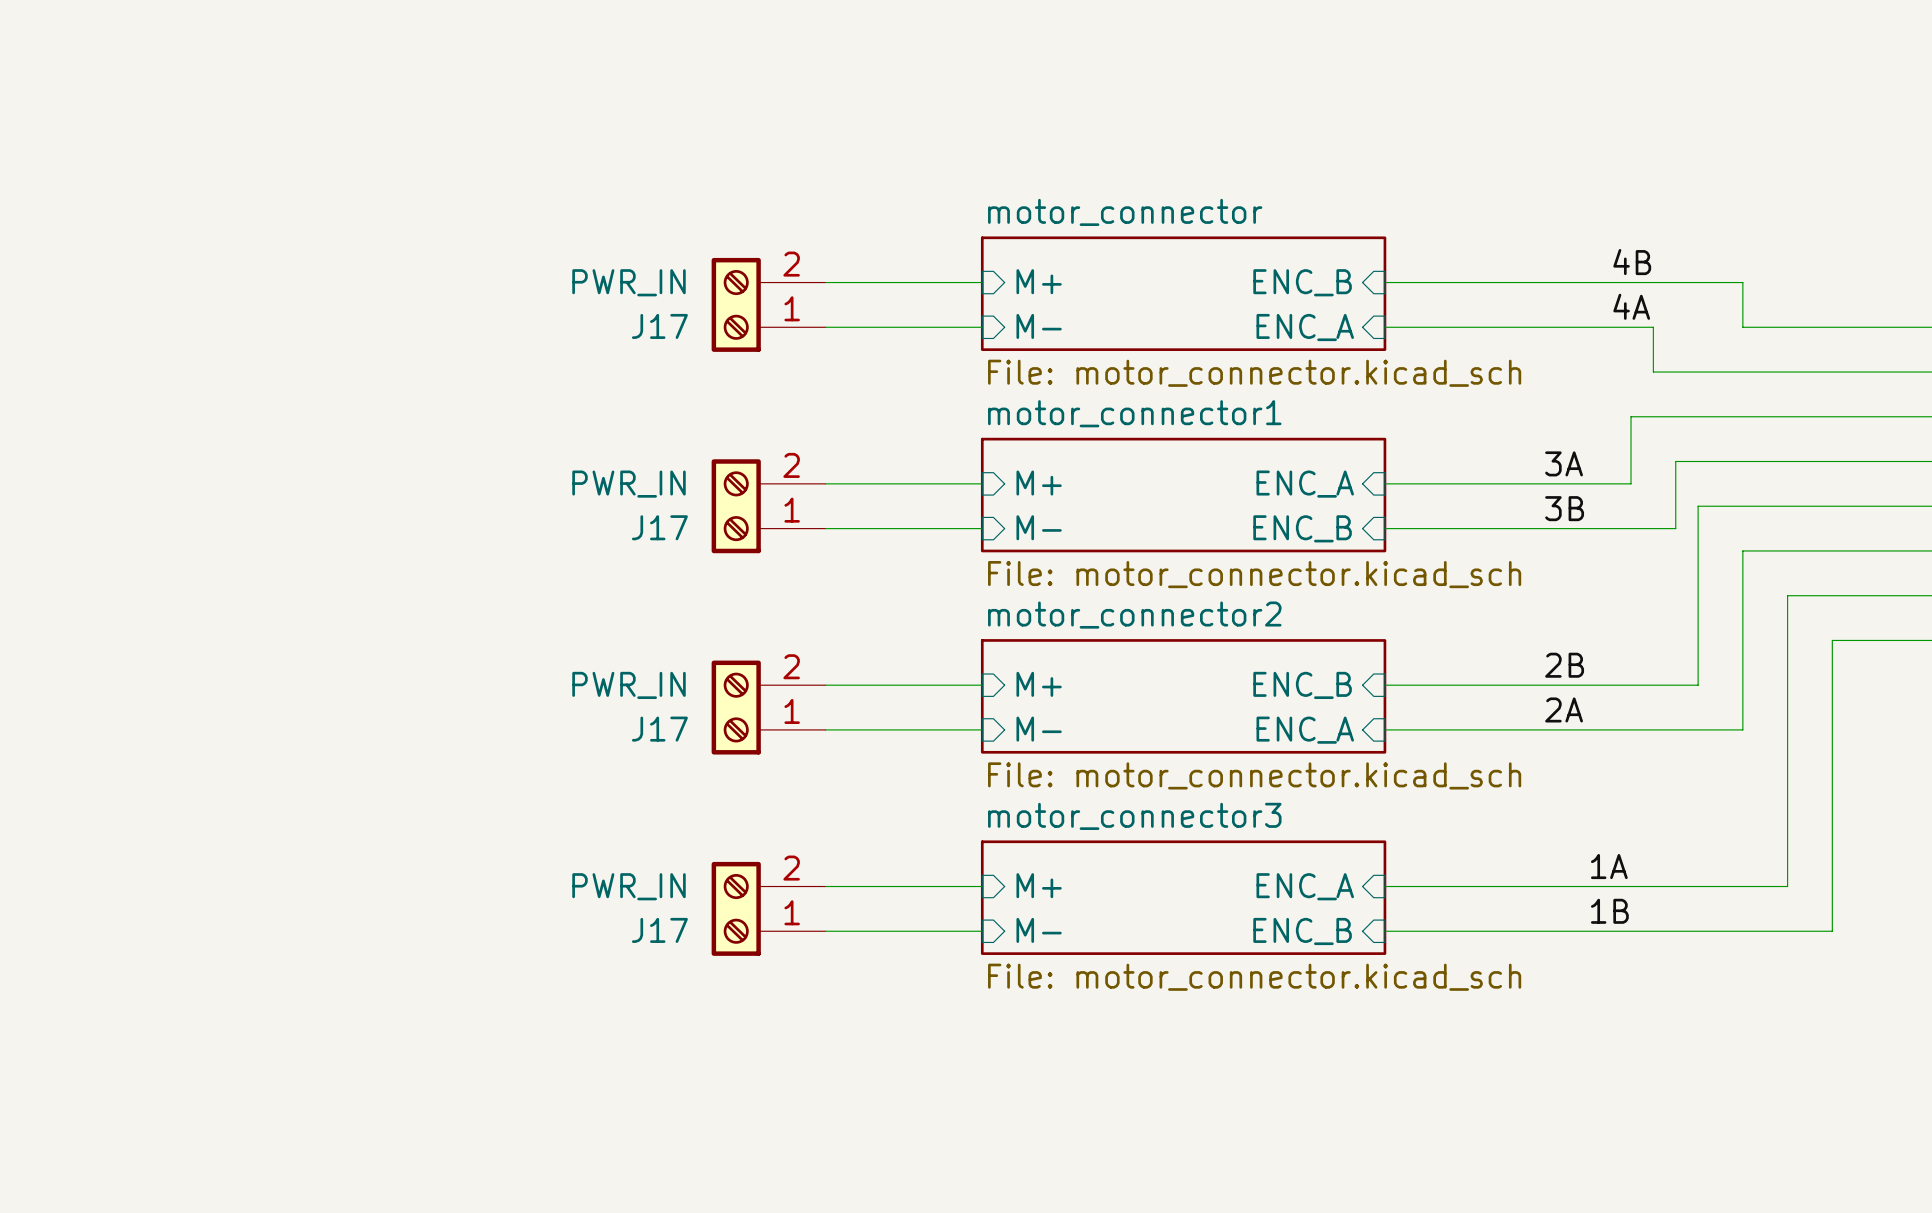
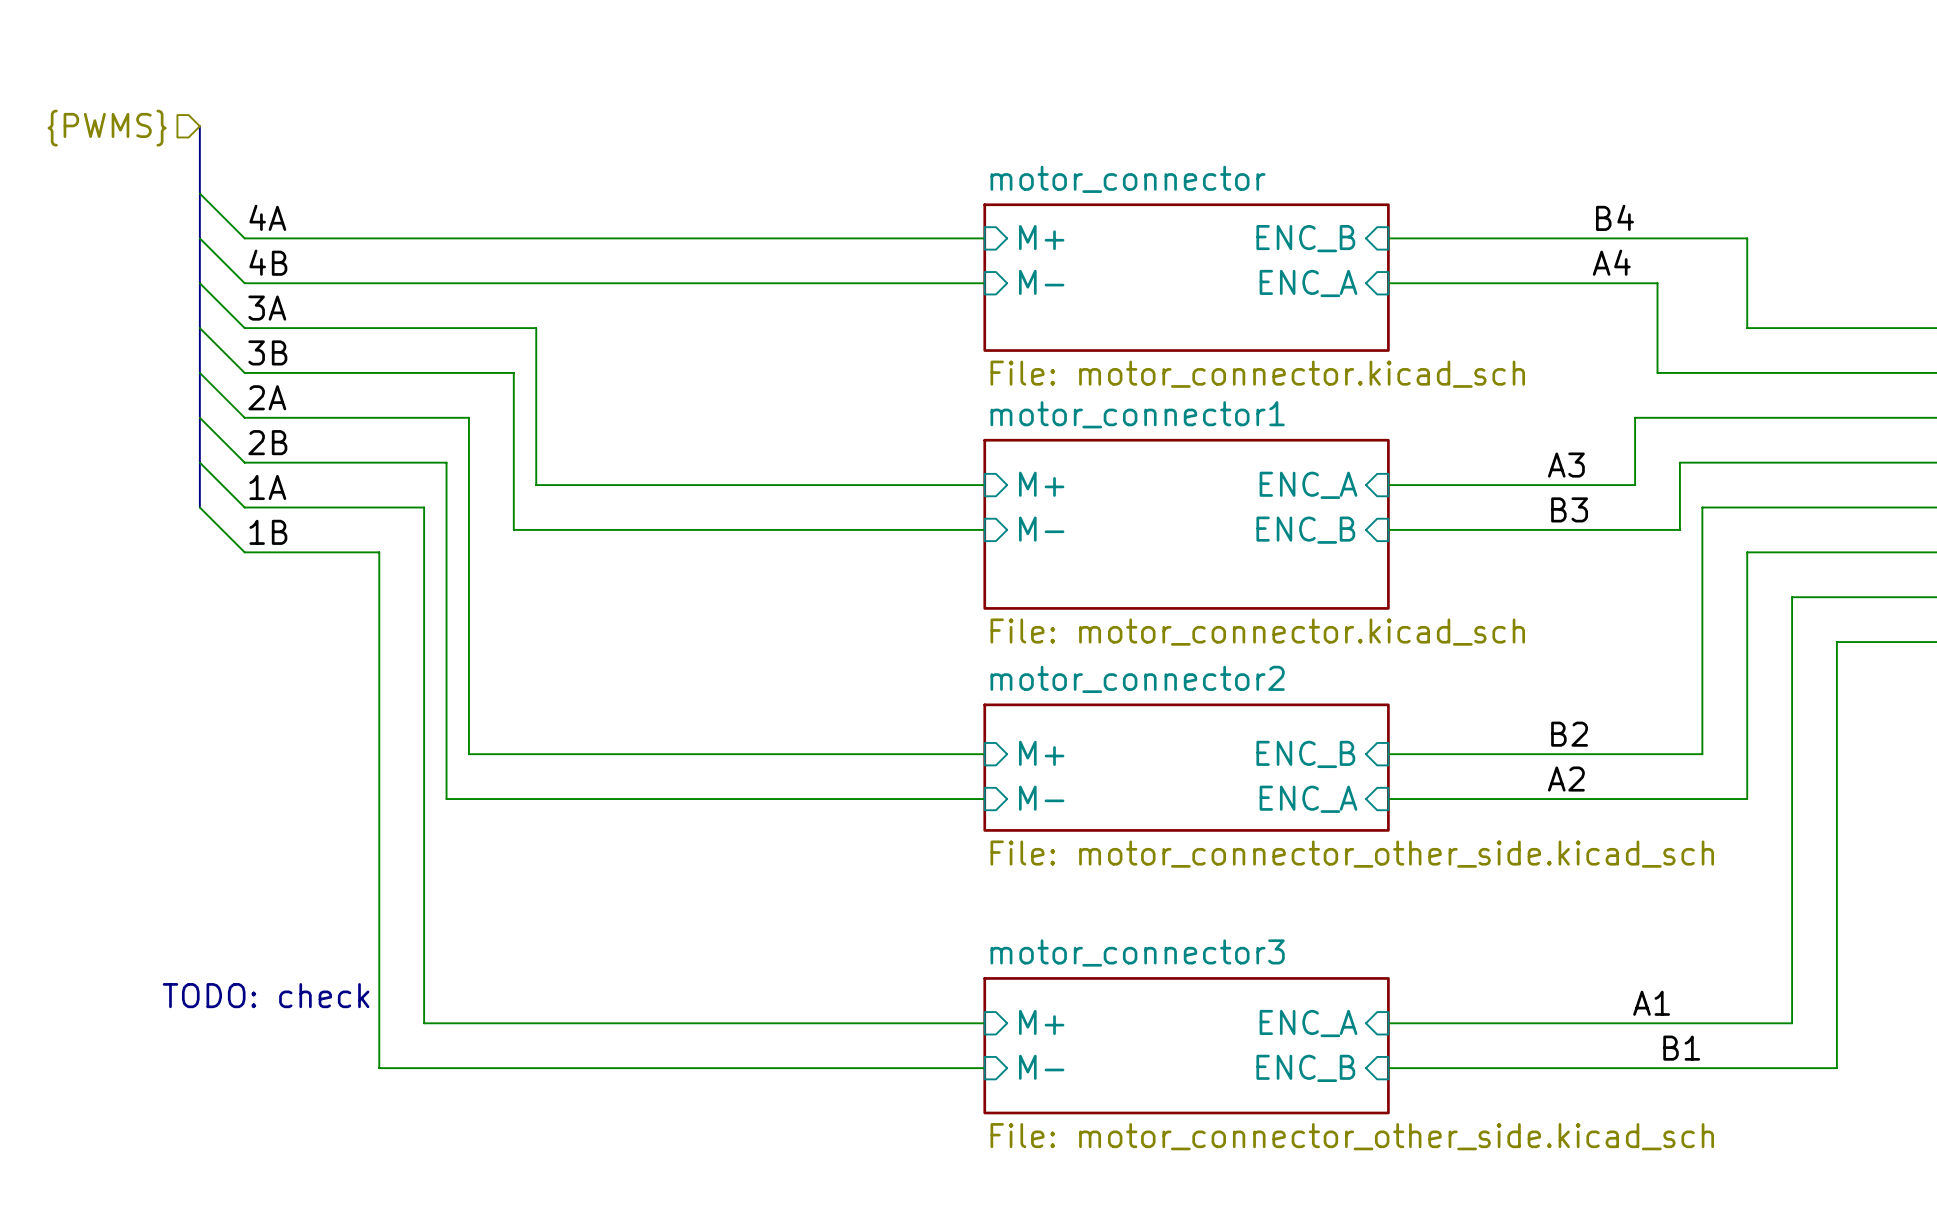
bus: none -> (199, 126) (199, 507)
hierarchical label: none -> {PWMS} (107, 128)
wire: none -> (199, 193) (244, 238) (984, 238)
label: none -> 4A (267, 217)
label: none -> B4 (1614, 217)
sheet motor_connector shape: [980, 236, 1387, 351] -> [983, 203, 1390, 352]
sheet pin: none -> M+ (1041, 237)
wire: none -> (199, 238) (244, 283) (827, 283)
wire: none -> (1388, 238) (1747, 238) (1747, 283)
sheet pin: none -> ENC_B (1305, 238)
label: none -> 4B (268, 262)
label: none -> A4 (1611, 262)
label: 4B (1632, 262) -> none
sheet pin: M+ (1039, 281) -> M- (1041, 282)
wire: none -> (199, 283) (244, 328) (536, 328) (536, 485) (827, 485)
sheet pin: ENC_B (1302, 282) -> ENC_A (1308, 283)
wire: (1653, 282) (1742, 282) -> (1657, 283) (1657, 328)
J17: PWR_IN (768, 304) -> none
label: 4A (1631, 306) -> none
label: none -> 3A (267, 308)
sheet pin: M- (1039, 326) -> none
wire: none -> (199, 328) (244, 372) (513, 372) (513, 529) (827, 529)
wire: (825, 327) (982, 327) -> none
sheet pin: ENC_A (1305, 327) -> none
wire: (1384, 327) (1653, 327) -> none
label: none -> 3B (267, 352)
wire: none -> (199, 372) (244, 417) (468, 417) (468, 754) (984, 754)
label: none -> 2A (267, 397)
wire: none -> (199, 417) (244, 462) (446, 462) (446, 799) (984, 799)
sheet motor_connector1 shape: [980, 437, 1387, 553] -> [983, 438, 1390, 610]
label: none -> 2B (267, 442)
wire: none -> (199, 462) (244, 507) (424, 507) (424, 1023) (984, 1023)
label: 3A (1564, 463) -> A3 (1566, 465)
label: none -> 1A (267, 487)
wire: none -> (199, 507) (244, 552) (379, 552) (379, 1068) (984, 1068)
J17: PWR_IN (768, 506) -> none
label: 3B (1564, 508) -> B3 (1569, 509)
label: none -> 1B (268, 532)
sheet motor_connector2 shape: [980, 639, 1387, 754] -> [983, 703, 1390, 832]
label: 2B (1564, 665) -> none
sheet pin: M+ (1039, 684) -> none
wire: (825, 685) (982, 685) -> none
sheet pin position: ENC_B (1302, 685) -> ENC_B (1305, 754)
wire: (1384, 685) (1698, 685) -> (1388, 754) (1702, 754) (1702, 686)
J17: PWR_IN (768, 707) -> none
label: 2A (1564, 709) -> none
wire: (825, 729) (982, 729) -> none
sheet pin: M- (1039, 729) -> none
wire: (1384, 729) (1742, 729) -> (1388, 799) (1747, 799) (1747, 731)
sheet pin: ENC_A (1305, 730) -> none
label: none -> B2 (1569, 734)
sheet pin: none -> M+ (1041, 753)
sheet motor_connector2 value: File: motor_connector.kicad_sch (1254, 775) -> File: motor_connector_other_side.kicad_sch (1352, 854)
label: none -> A2 (1566, 779)
sheet pin: none -> M- (1041, 798)
sheet pin: none -> ENC_A (1308, 799)
sheet motor_connector3 shape: [980, 840, 1387, 955] -> [983, 977, 1390, 1115]
label: 1A (1609, 866) -> none
sheet pin: M+ (1039, 885) -> none
wire: (825, 886) (982, 886) -> none
sheet pin: ENC_A (1305, 886) -> none
wire: (1384, 886) (1787, 886) -> (1388, 1023) (1792, 1023) (1792, 888)
J17: PWR_IN (768, 908) -> none
label: 1B (1609, 911) -> none
sheet pin: M- (1039, 930) -> none
wire: (825, 931) (982, 931) -> none
sheet pin: ENC_B (1302, 931) -> none
wire: (1384, 931) (1832, 931) -> (1388, 1068) (1836, 1068) (1836, 933)
sheet motor_connector3 value: File: motor_connector.kicad_sch (1254, 977) -> File: motor_connector_other_side.kicad_sch (1352, 1136)
text: none -> TODO: check (266, 995)
label: none -> A1 (1651, 1003)
sheet pin: none -> M+ (1041, 1022)
sheet pin: none -> ENC_A (1308, 1023)
label: none -> B1 (1681, 1048)
sheet pin: none -> M- (1041, 1067)
sheet pin: none -> ENC_B (1305, 1068)

